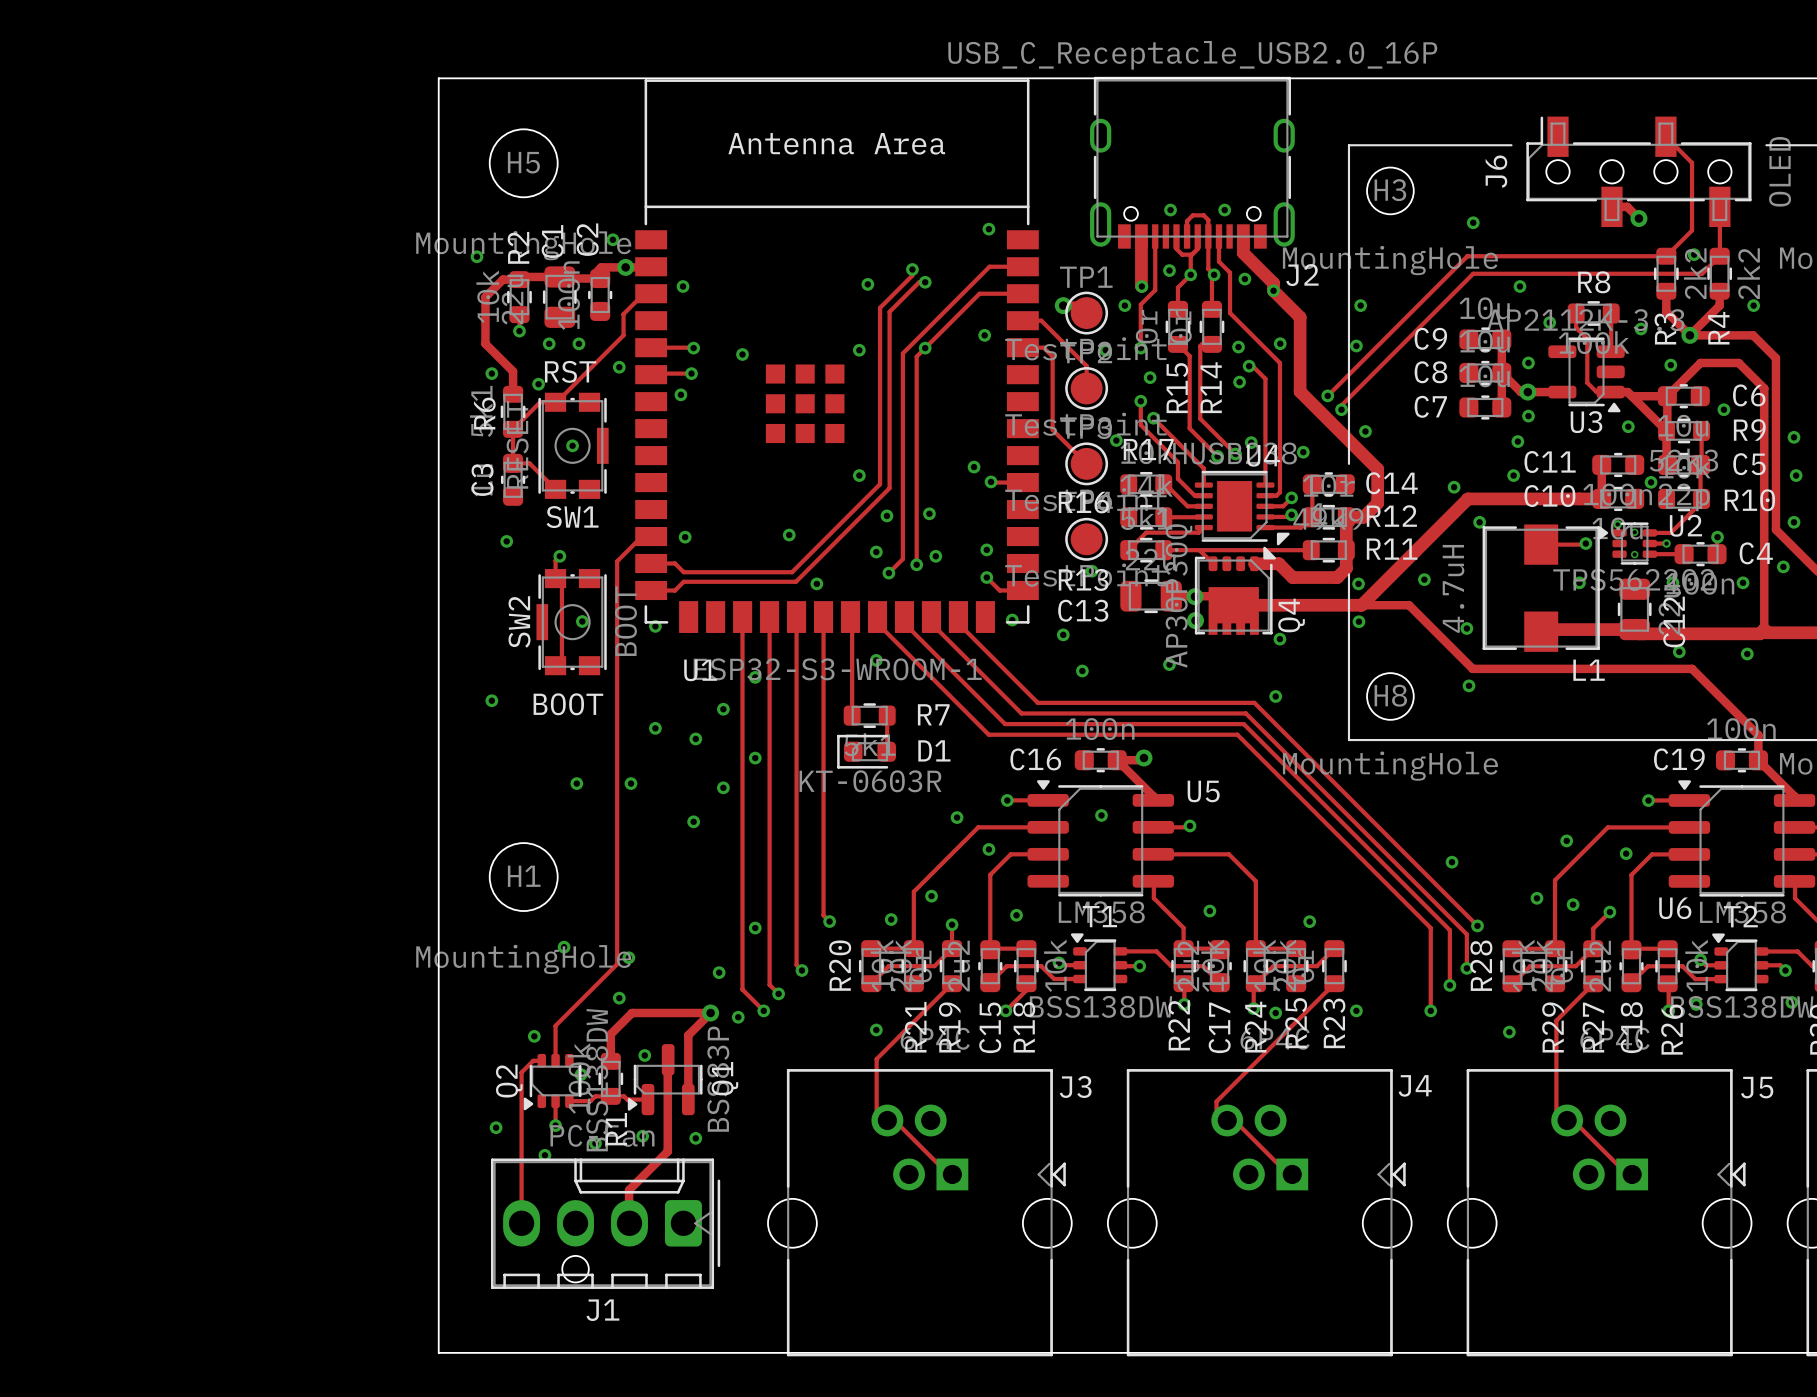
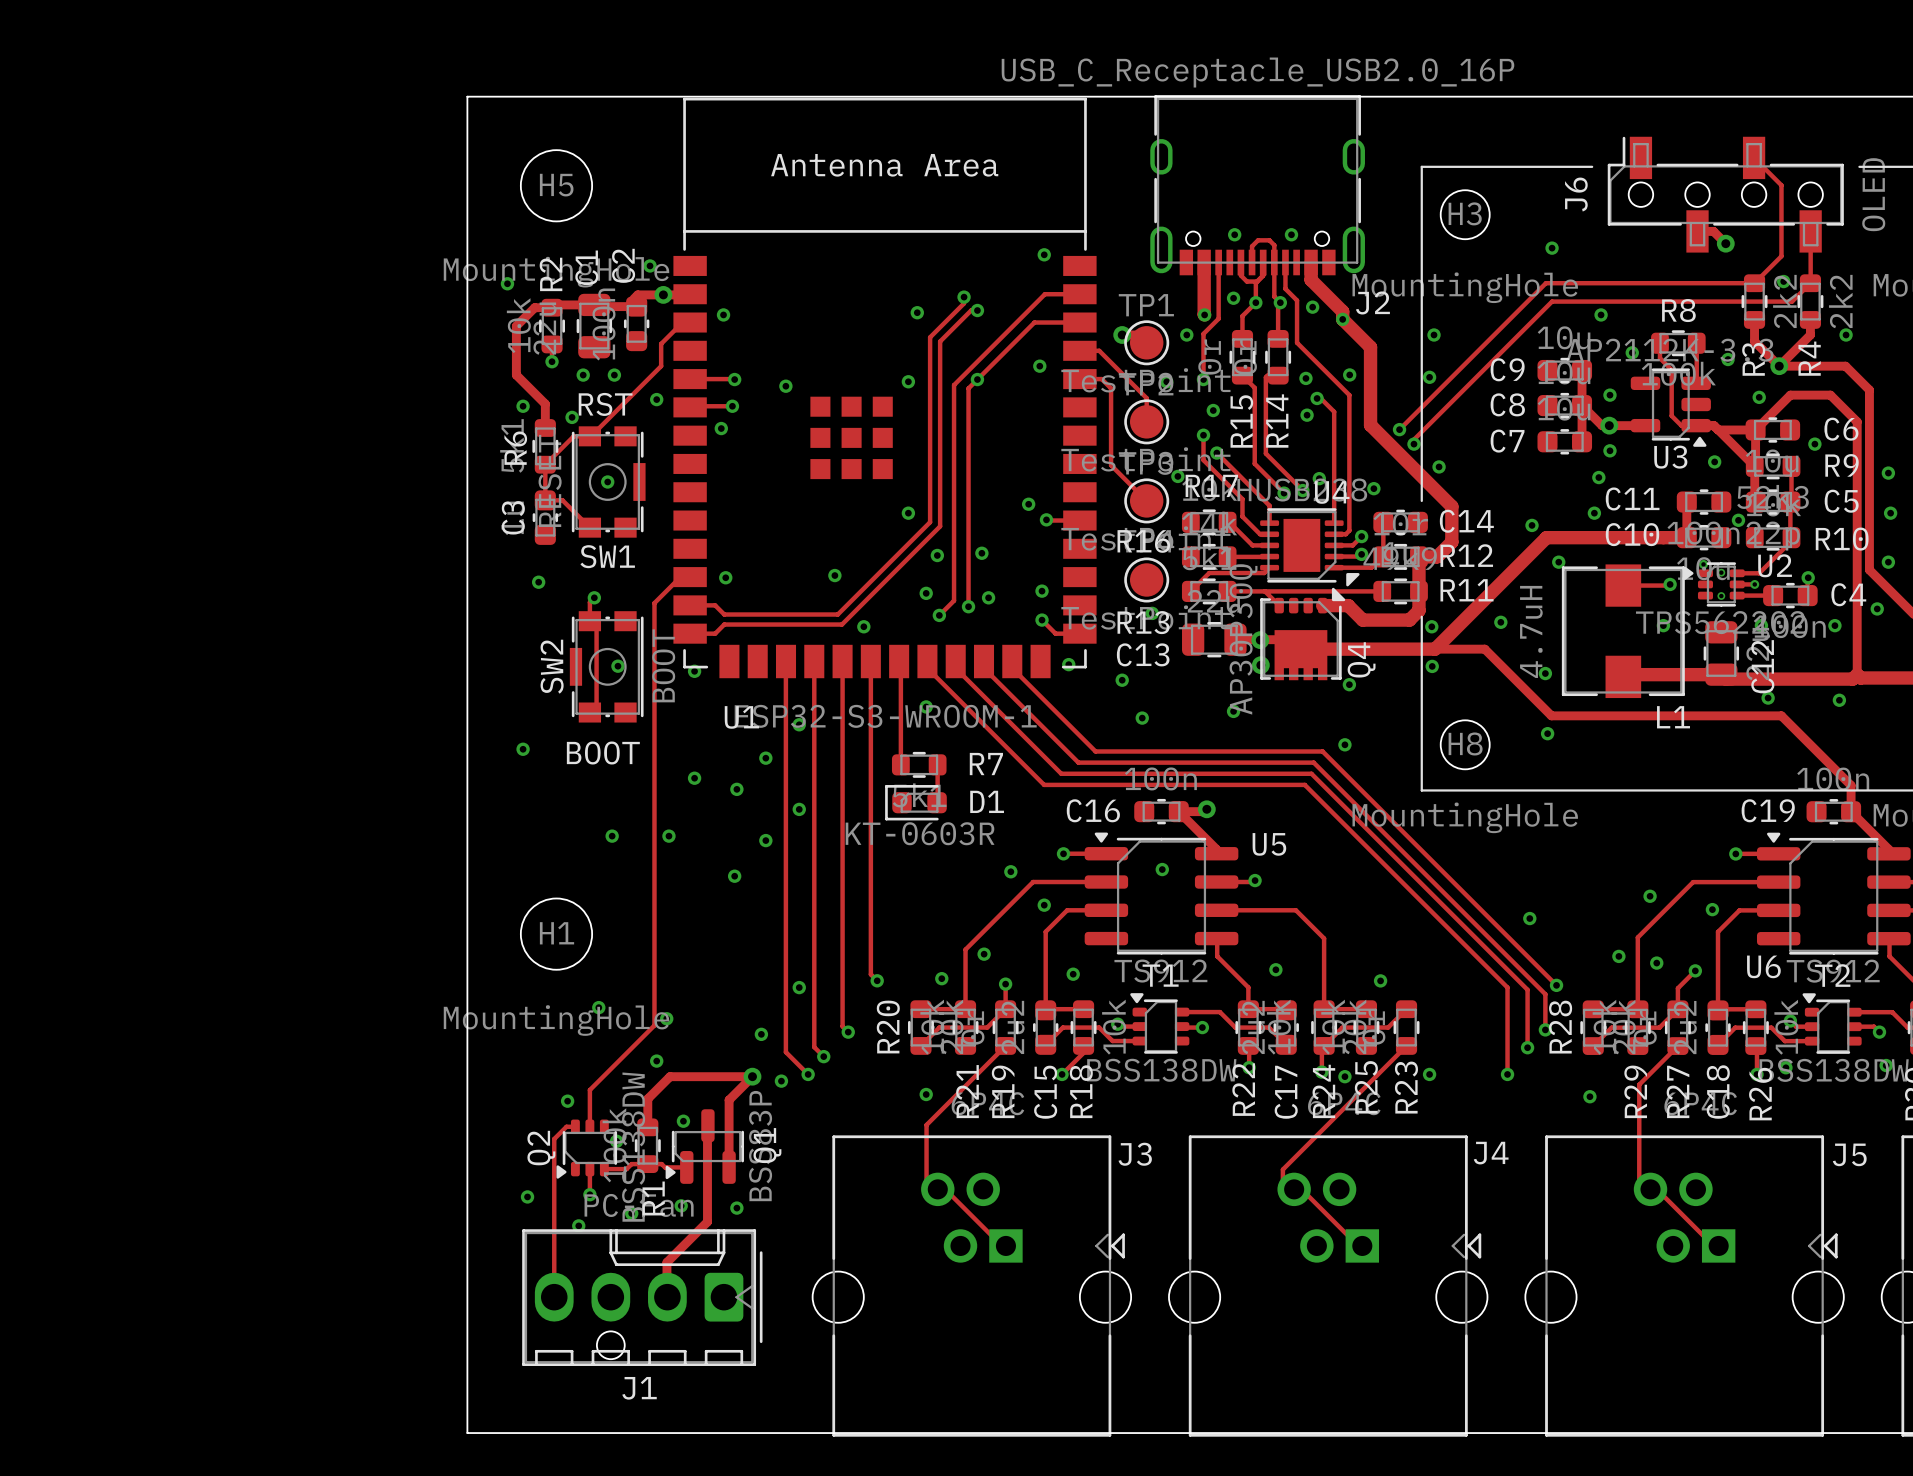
U5 value: LM358 (1101, 912) -> TS912 (1160, 971)
U6 value: LM358 (1742, 912) -> TS912 (1833, 971)

